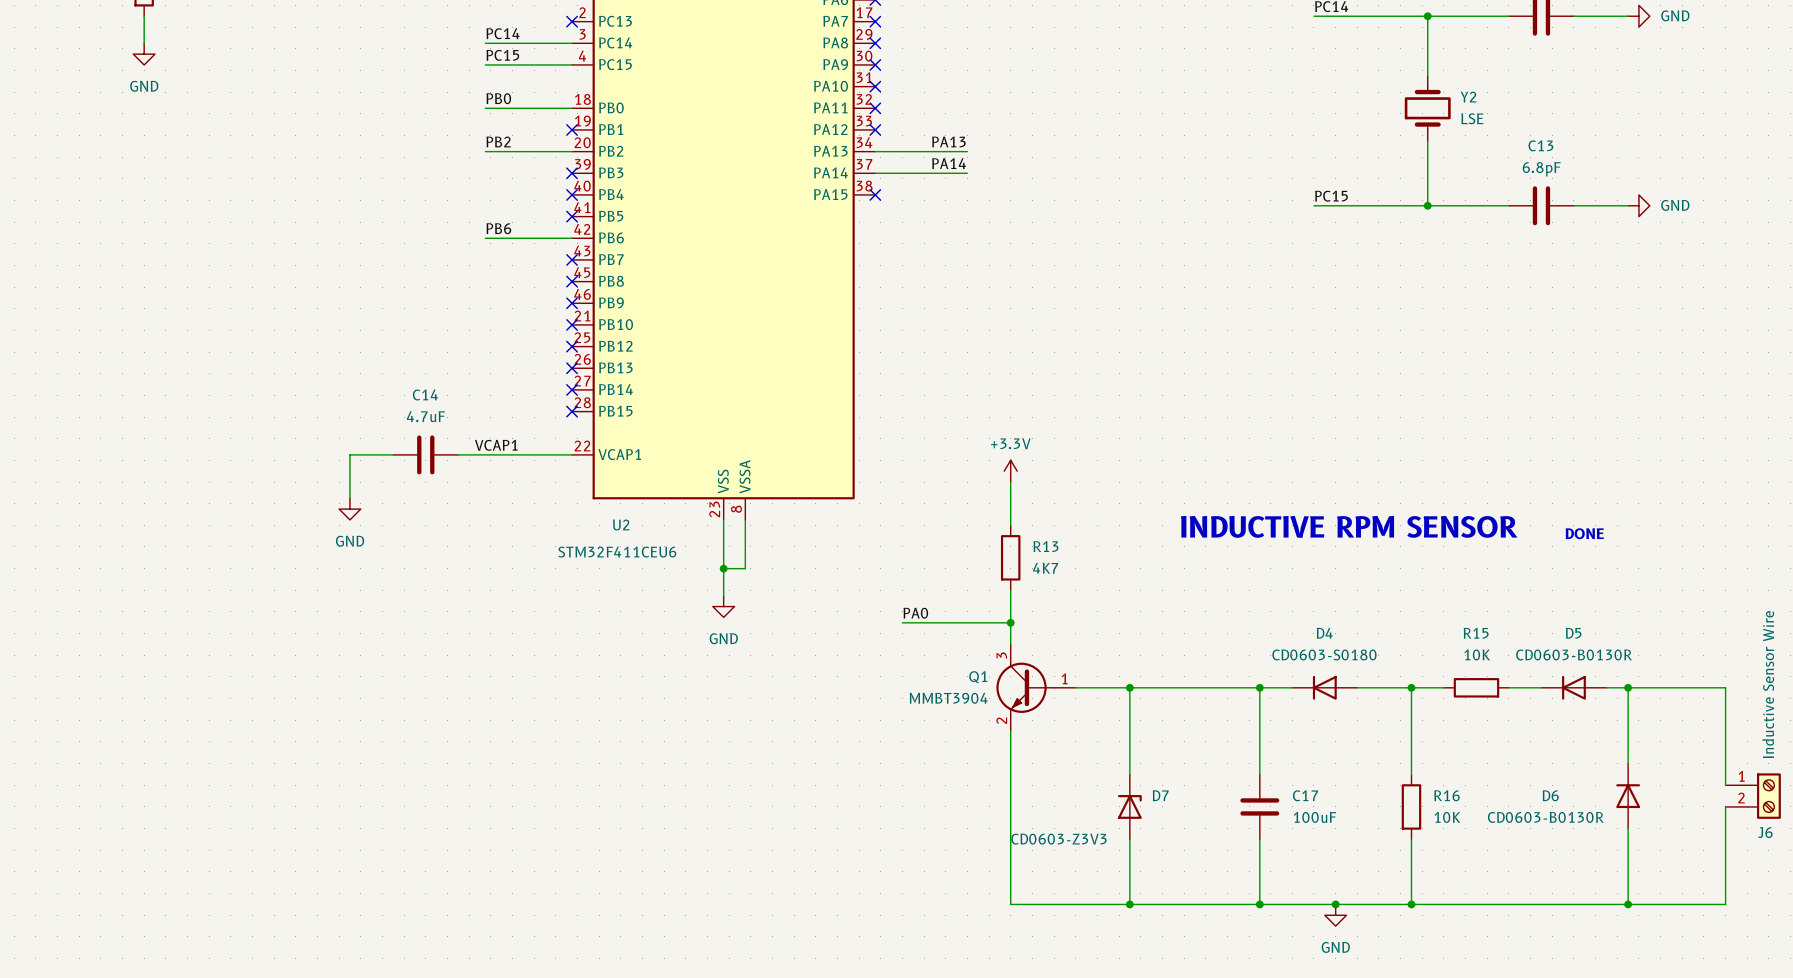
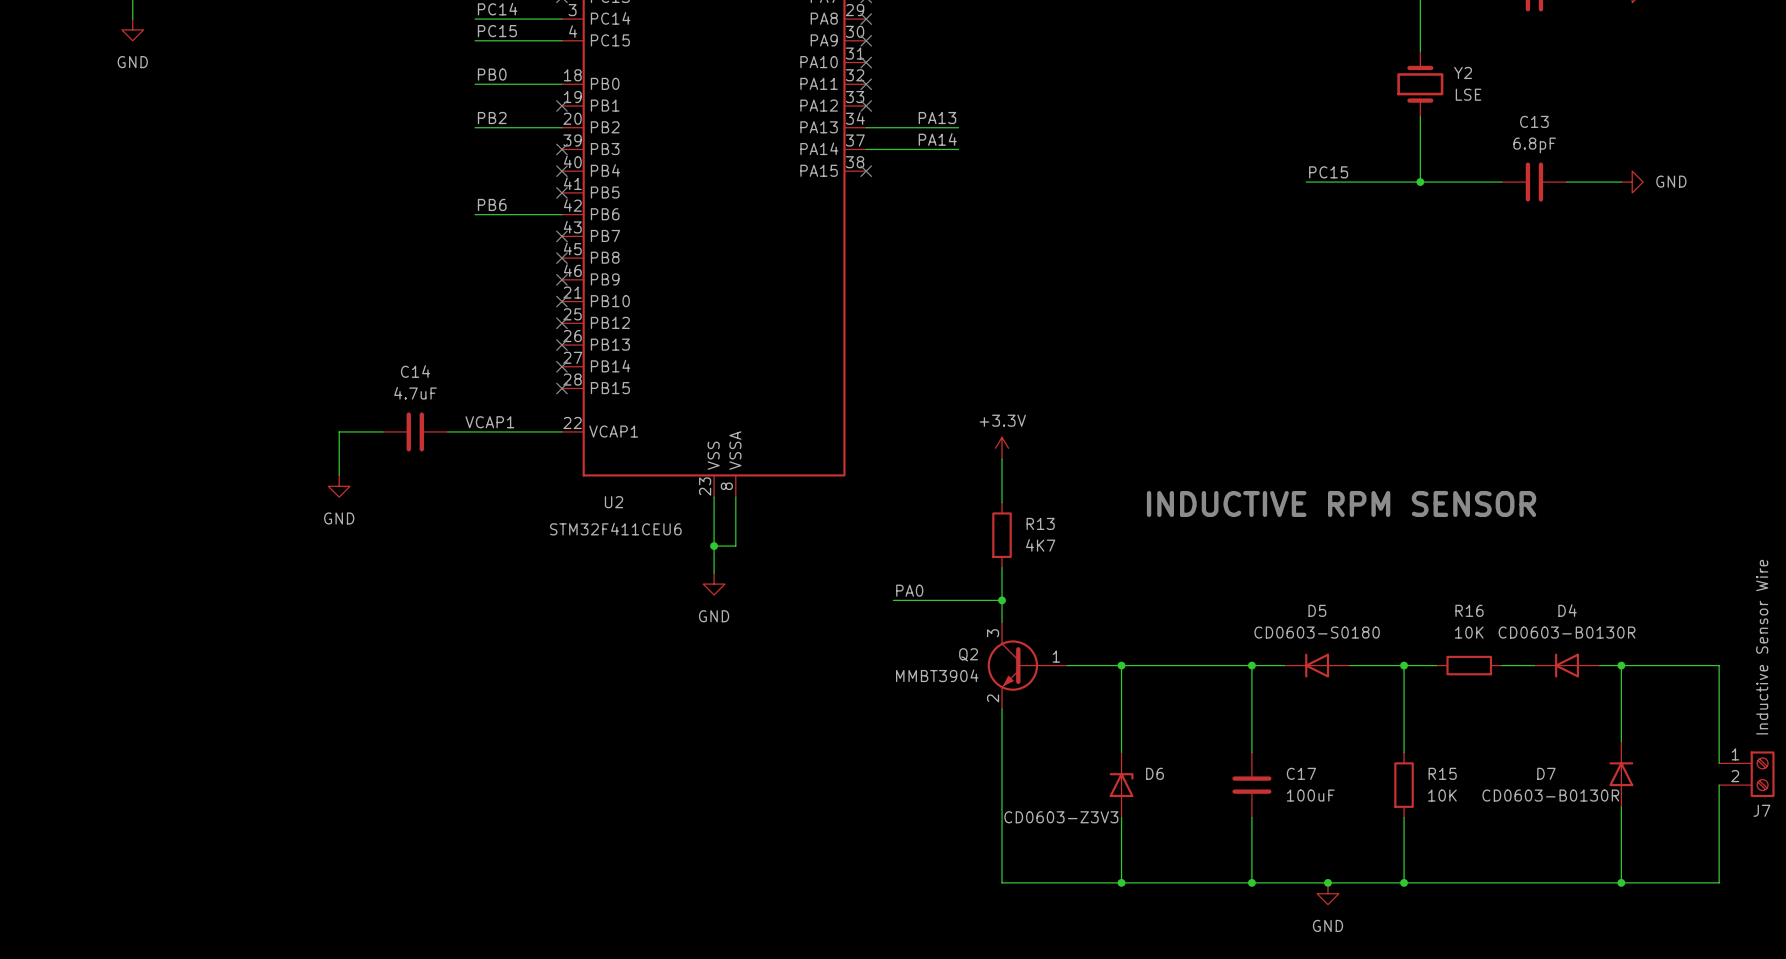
text: DONE (1584, 533) -> none
D4 name: D4 (1324, 633) -> D5 (1317, 610)
R15 name: R15 (1476, 633) -> R16 (1469, 610)
D5 name: D5 (1573, 633) -> D4 (1567, 610)
Q1 name: Q1 (978, 677) -> Q2 (968, 654)
D7 name: D7 (1160, 795) -> D6 (1154, 773)
R16 name: R16 (1446, 795) -> R15 (1442, 773)
D6 name: D6 (1550, 795) -> D7 (1546, 773)
J6 name: J6 (1765, 832) -> J7 (1761, 810)

